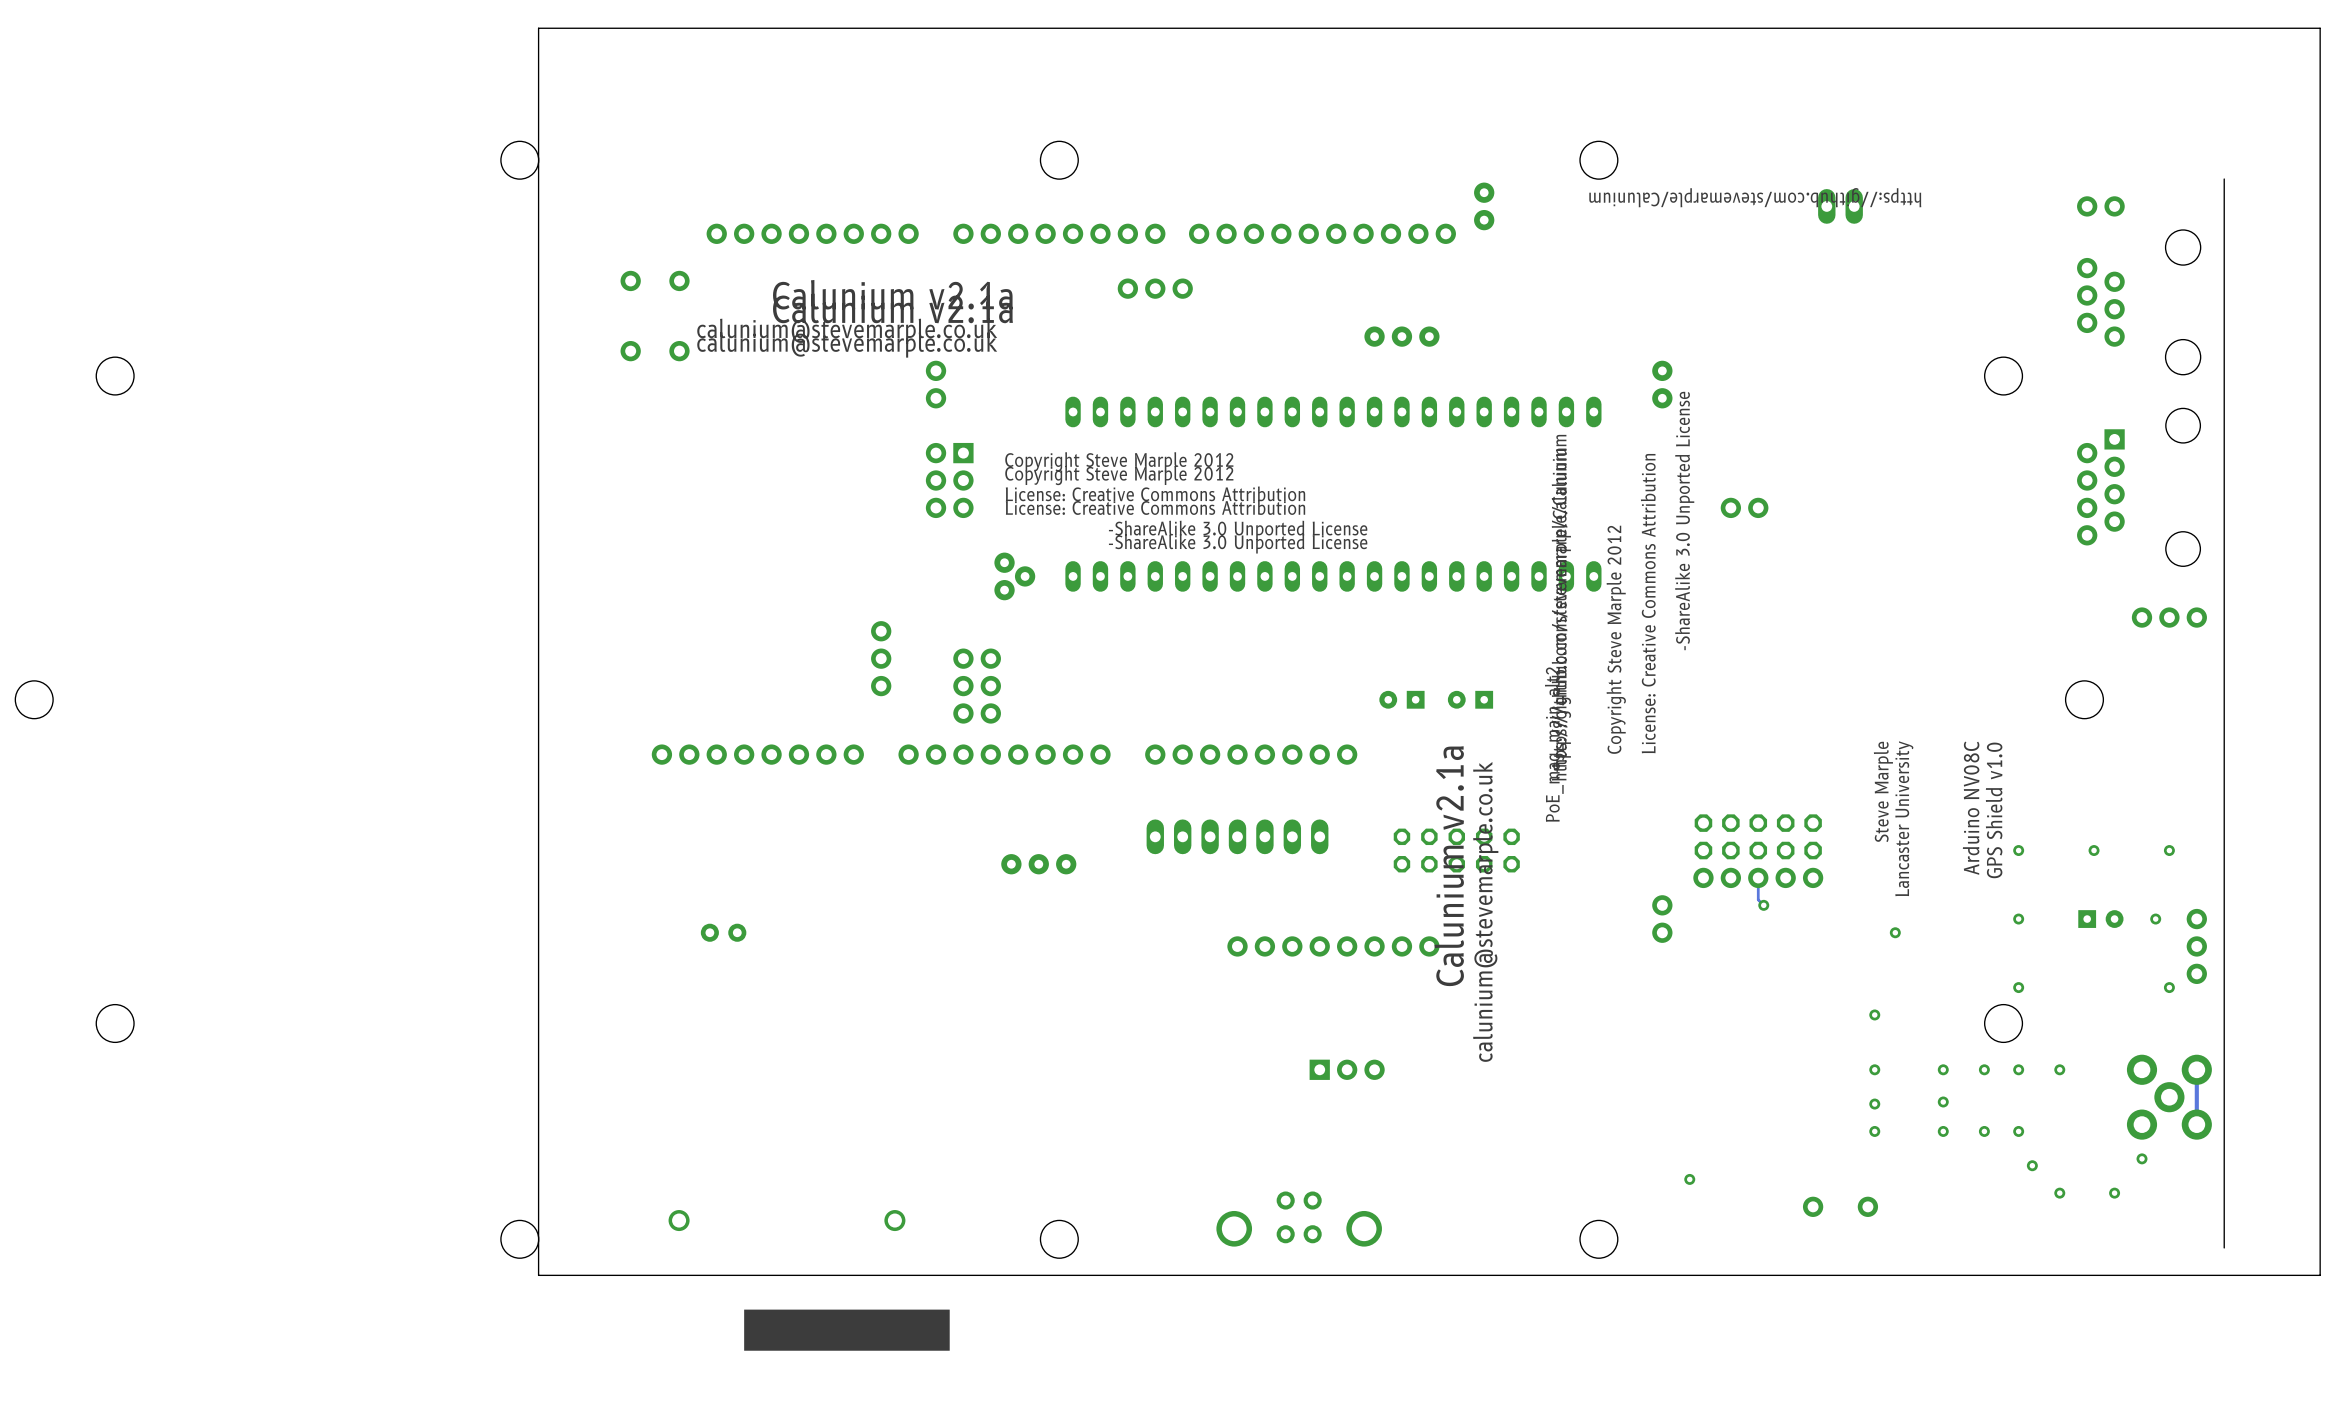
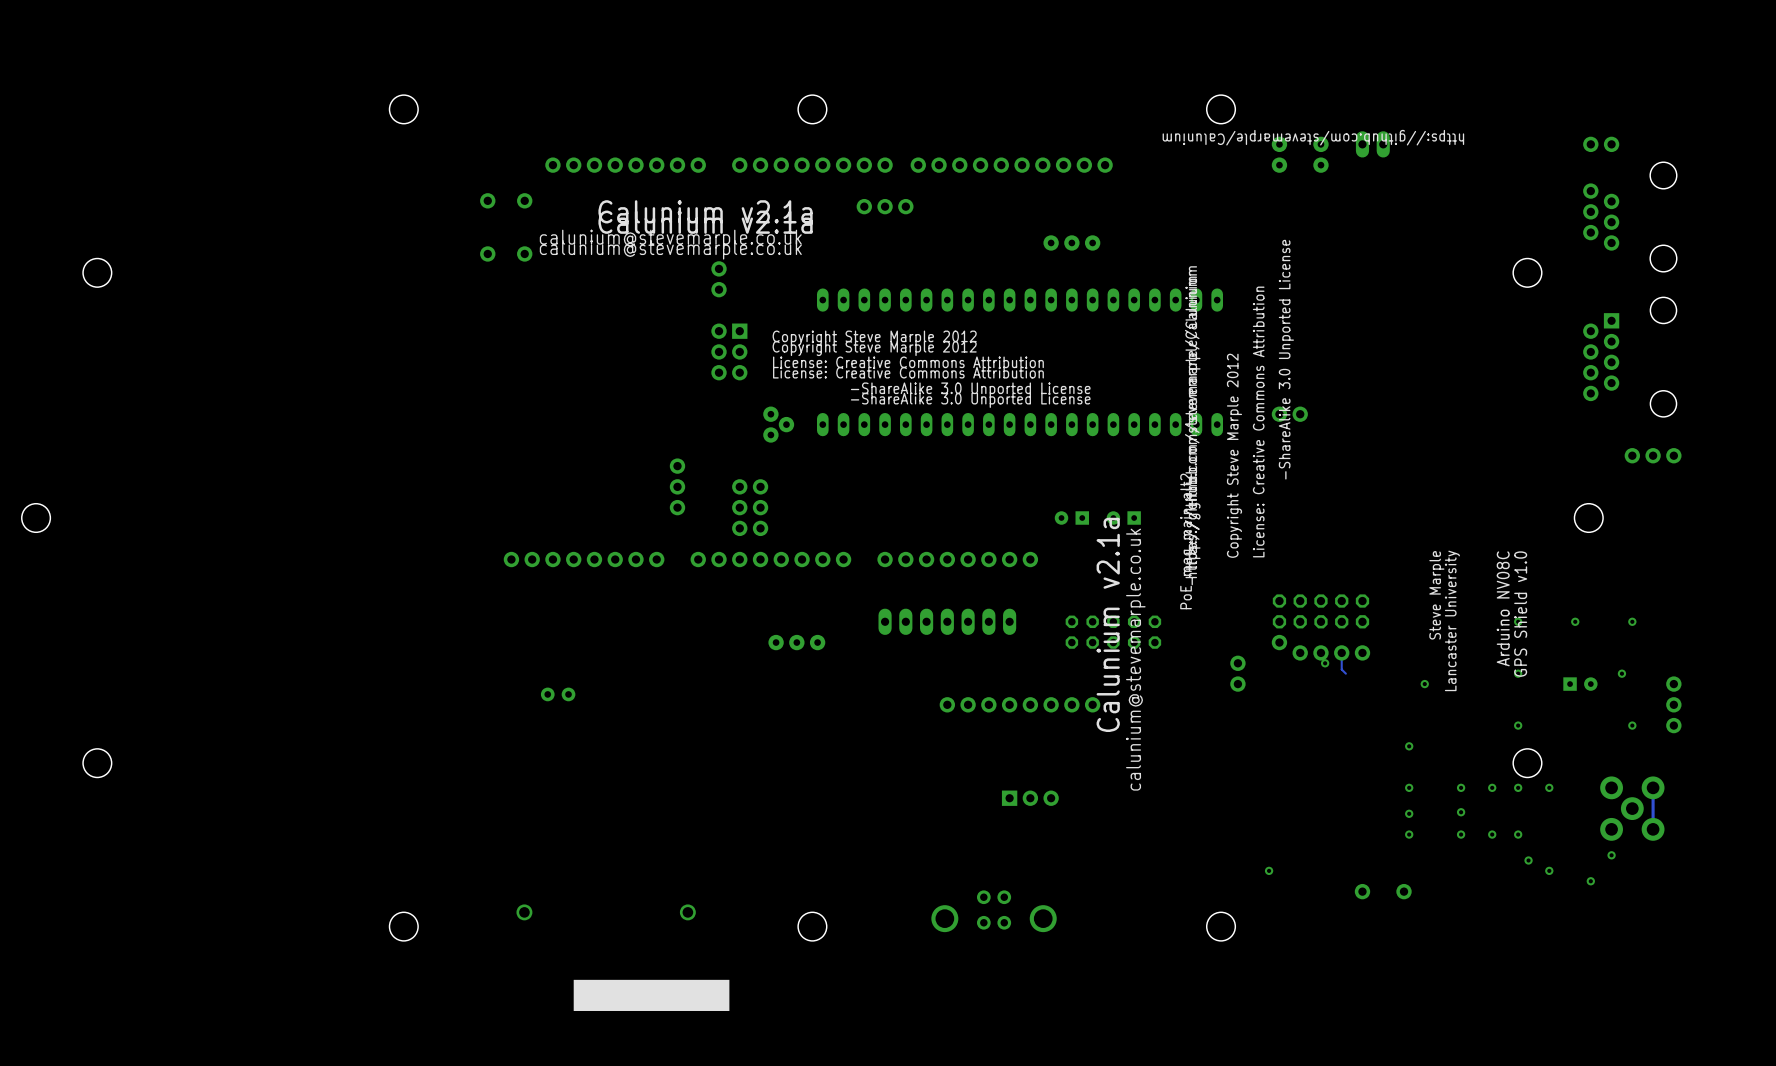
board edge: (2320, 28) (538, 28) (538, 1275) (2320, 1275) (2320, 28) -> none
board edge: (2224, 179) (2224, 1247) -> none
part: (1484, 206) -> none
part position: (1840, 206) -> (1372, 144)
part: none -> (1279, 154)
part: none -> (1320, 154)
part: (1662, 384) -> none
part position: (1744, 507) -> (1289, 414)
part position: (1758, 836) -> (1320, 611)
via: none -> (1518, 621)
via: none -> (1575, 621)
via: none -> (1632, 621)
via: (2018, 850) -> none
via: (2094, 850) -> none
via: (2169, 850) -> none
part: none -> (1279, 642)
part: (1813, 877) -> none
part: none -> (1237, 663)
part: (1662, 905) -> none
via position: (1763, 905) -> (1325, 663)
via: none -> (1518, 673)
via: none -> (1621, 673)
part: none -> (1237, 684)
via: (2018, 919) -> none
part position: (2100, 919) -> (1580, 684)
via: (2155, 919) -> none
part: (1662, 932) -> none
via position: (1895, 932) -> (1424, 684)
via: none -> (1518, 725)
via: none -> (1632, 725)
via: (2018, 987) -> none
via: (2169, 987) -> none
via: none -> (1409, 746)
via: (1874, 1014) -> none
via: none -> (1409, 787)
via: none -> (1461, 787)
via: none -> (1492, 787)
via: none -> (1518, 787)
via: none -> (1549, 787)
via: (1874, 1069) -> none
via: (1943, 1069) -> none
via: (1984, 1069) -> none
via: (2018, 1069) -> none
via: (2059, 1069) -> none
track: (2196, 1069) (2196, 1124) -> (1653, 787) (1653, 829)
via: none -> (1461, 812)
via: none -> (1409, 813)
part position: (2169, 1097) -> (1632, 808)
via: (1943, 1101) -> none
via: (1874, 1104) -> none
via: none -> (1409, 834)
via: none -> (1461, 834)
via: none -> (1492, 834)
via: none -> (1518, 834)
via: (1874, 1131) -> none
via: (1943, 1131) -> none
via: (1984, 1131) -> none
via: (2018, 1131) -> none
via: none -> (1611, 855)
via: none -> (1528, 860)
via: (2142, 1158) -> none
via position: (1689, 1179) -> (1269, 870)
via: none -> (1590, 881)
part: none -> (1362, 891)
part: none -> (1404, 891)
via: (2059, 1193) -> none
via: (2114, 1193) -> none
part: (1813, 1206) -> none
part: (1867, 1206) -> none

